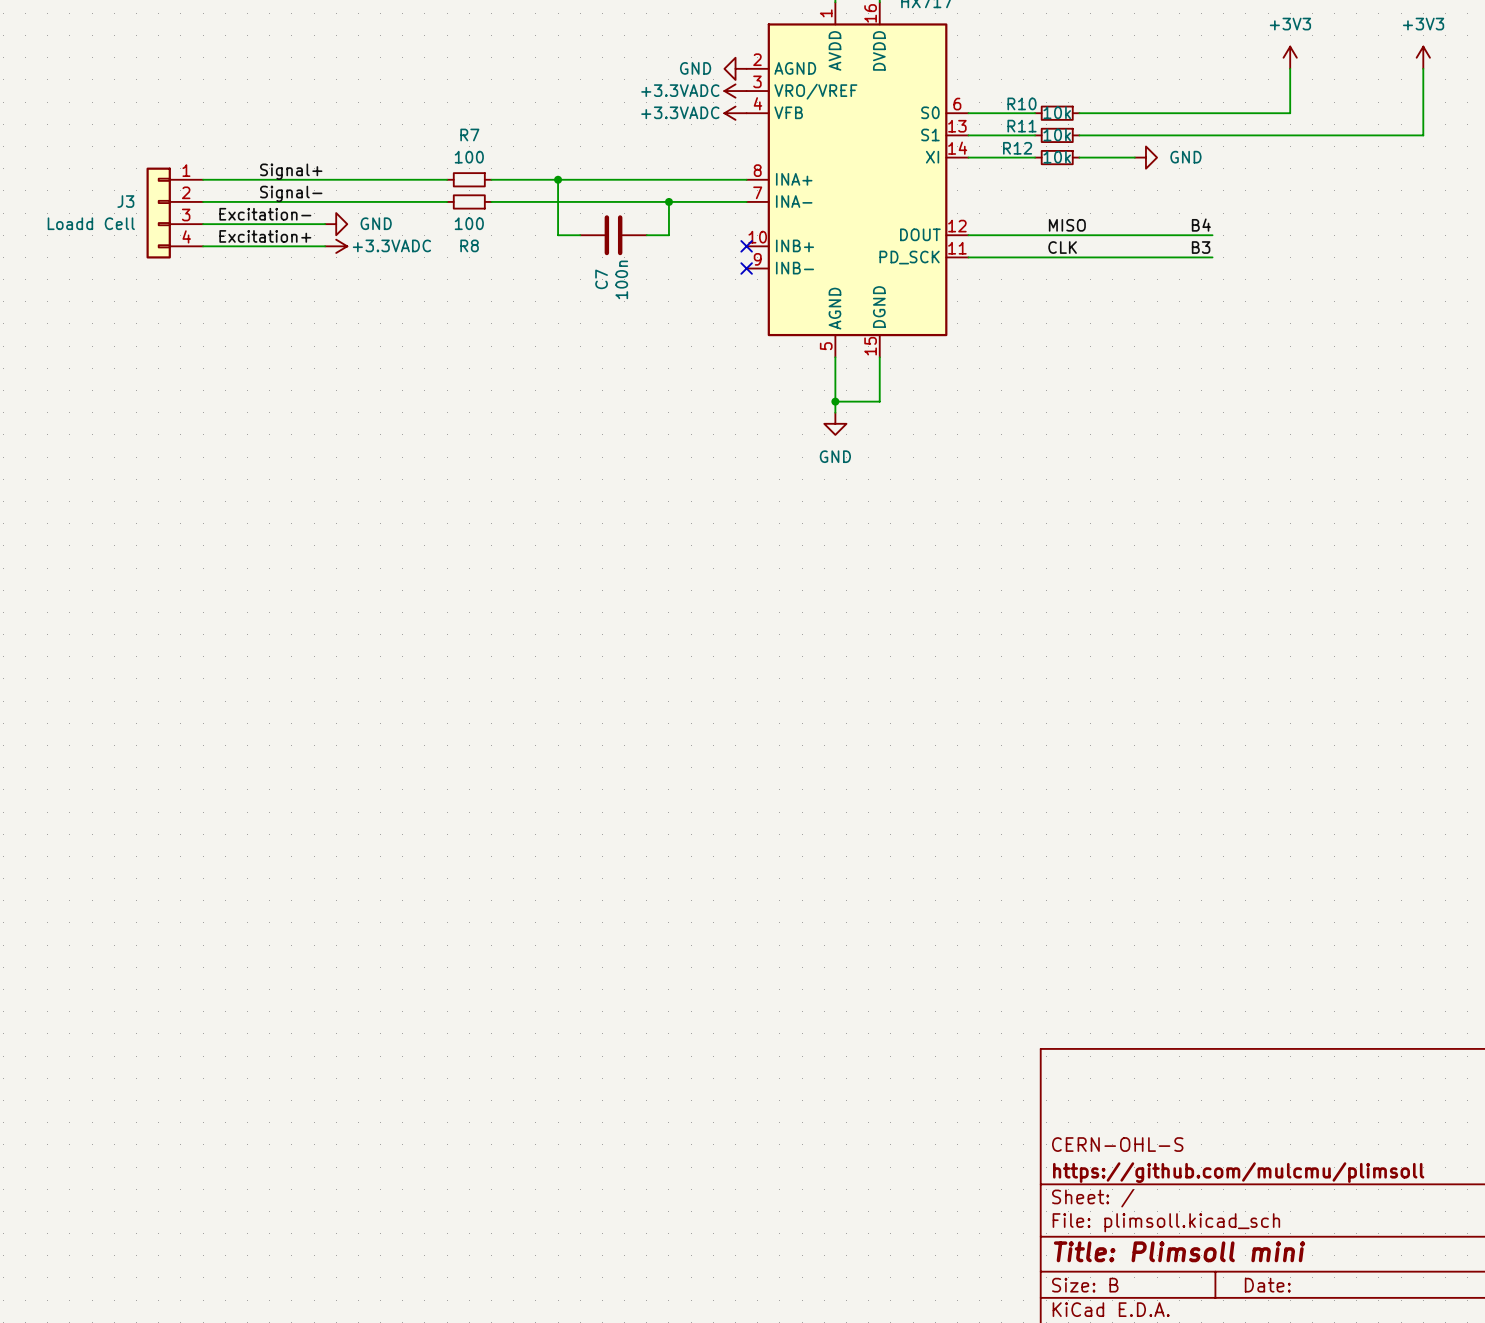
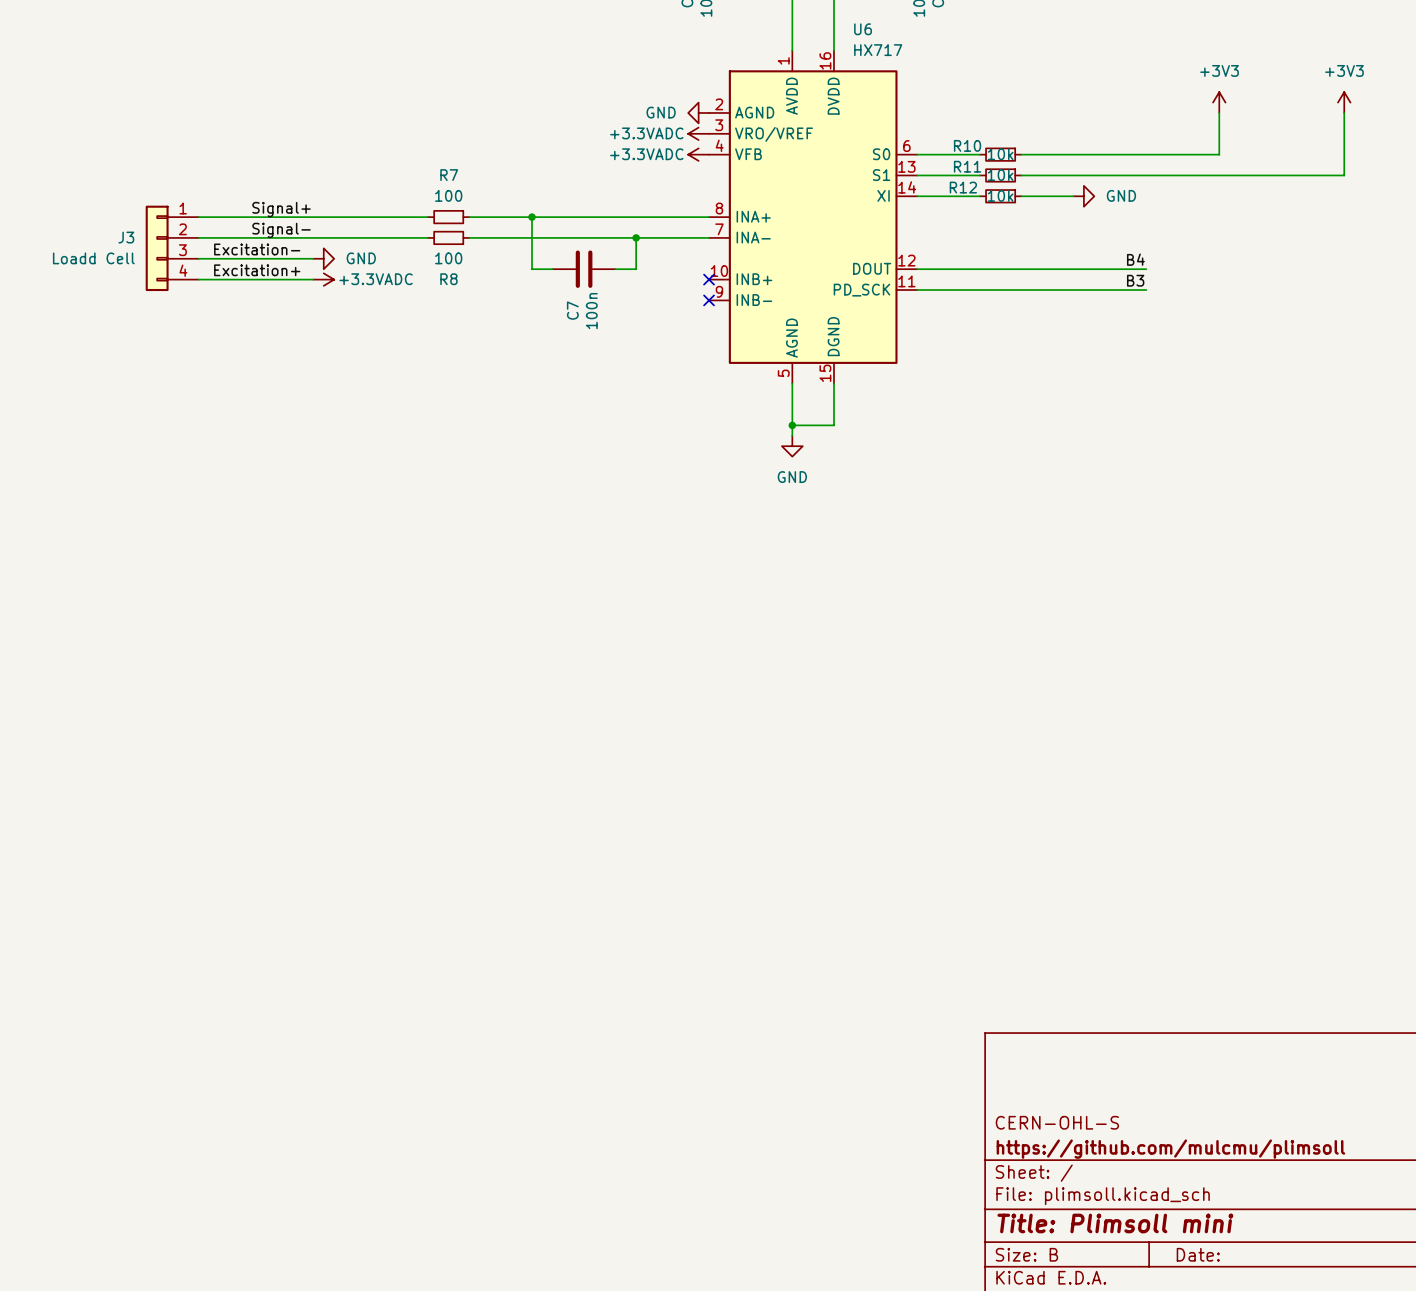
label: MISO (1067, 225) -> none
label: CLK (1062, 247) -> none

